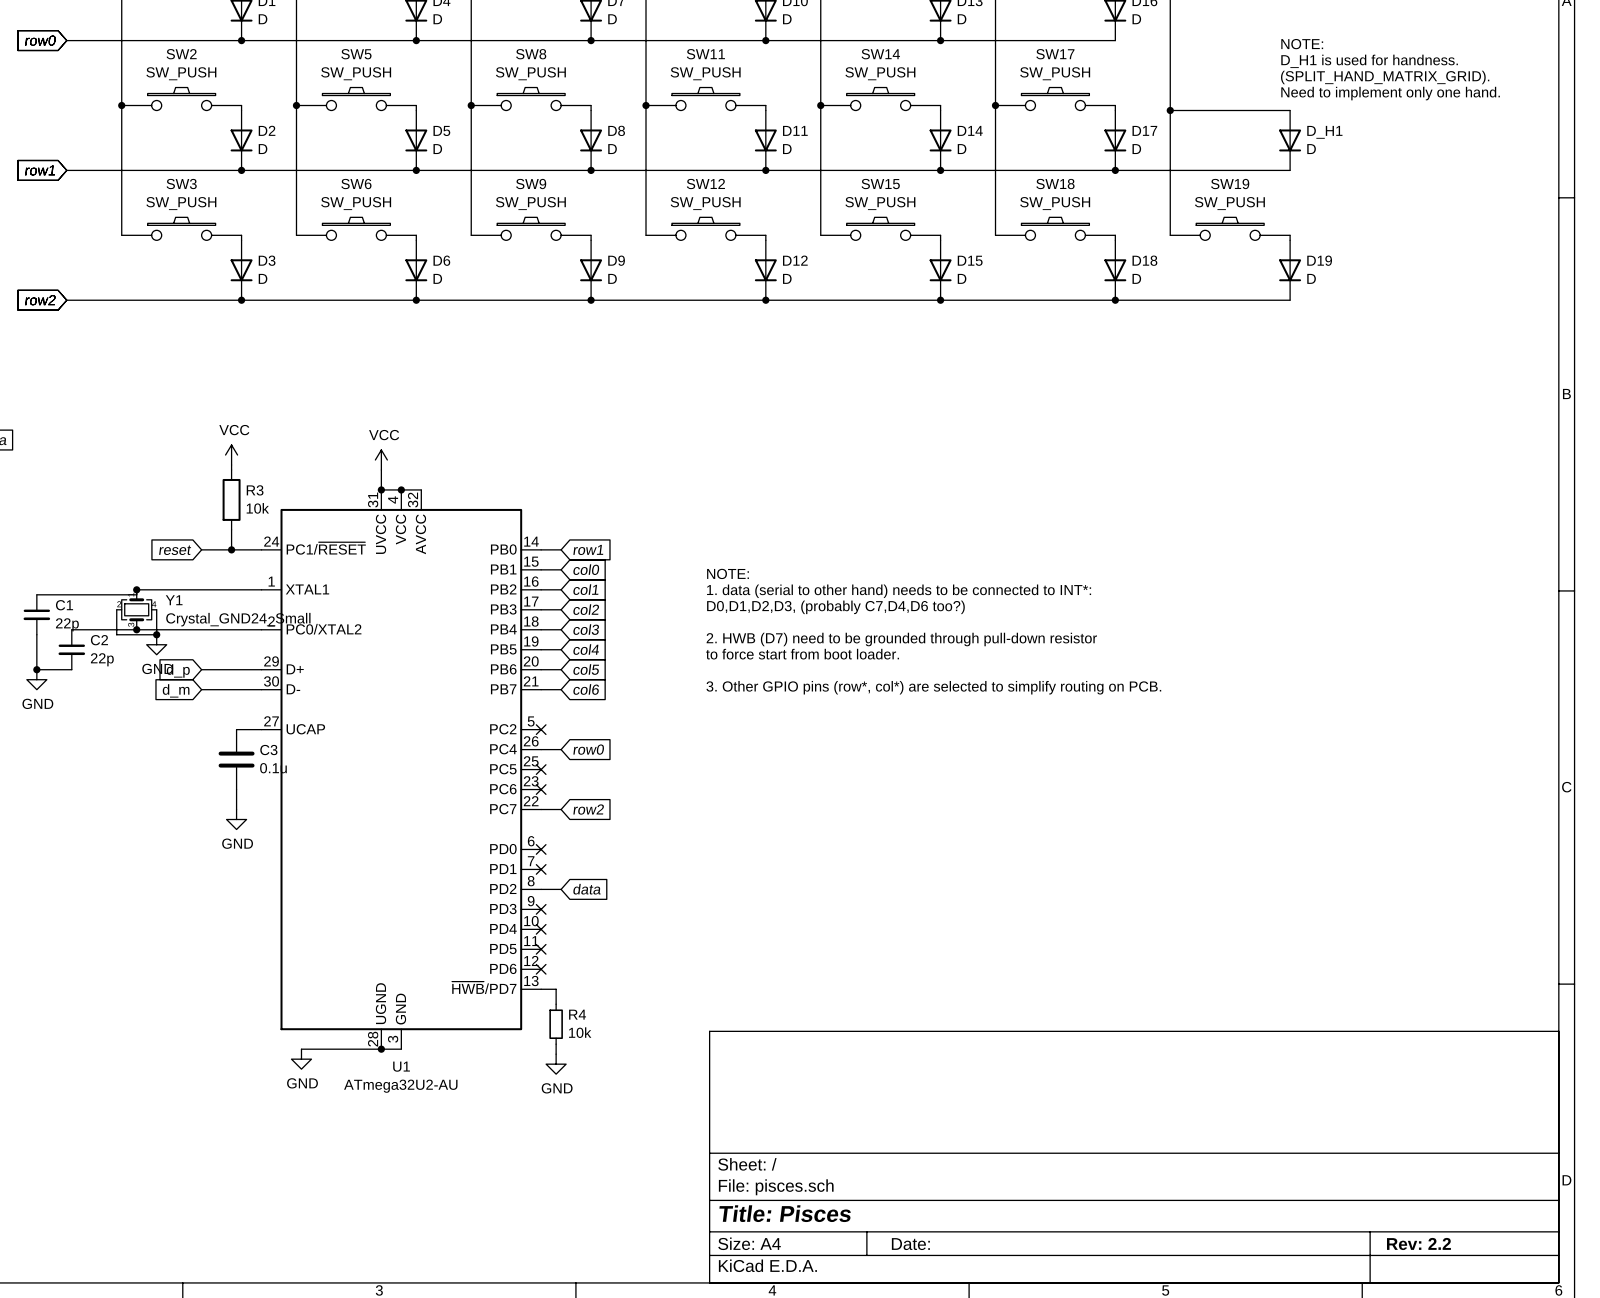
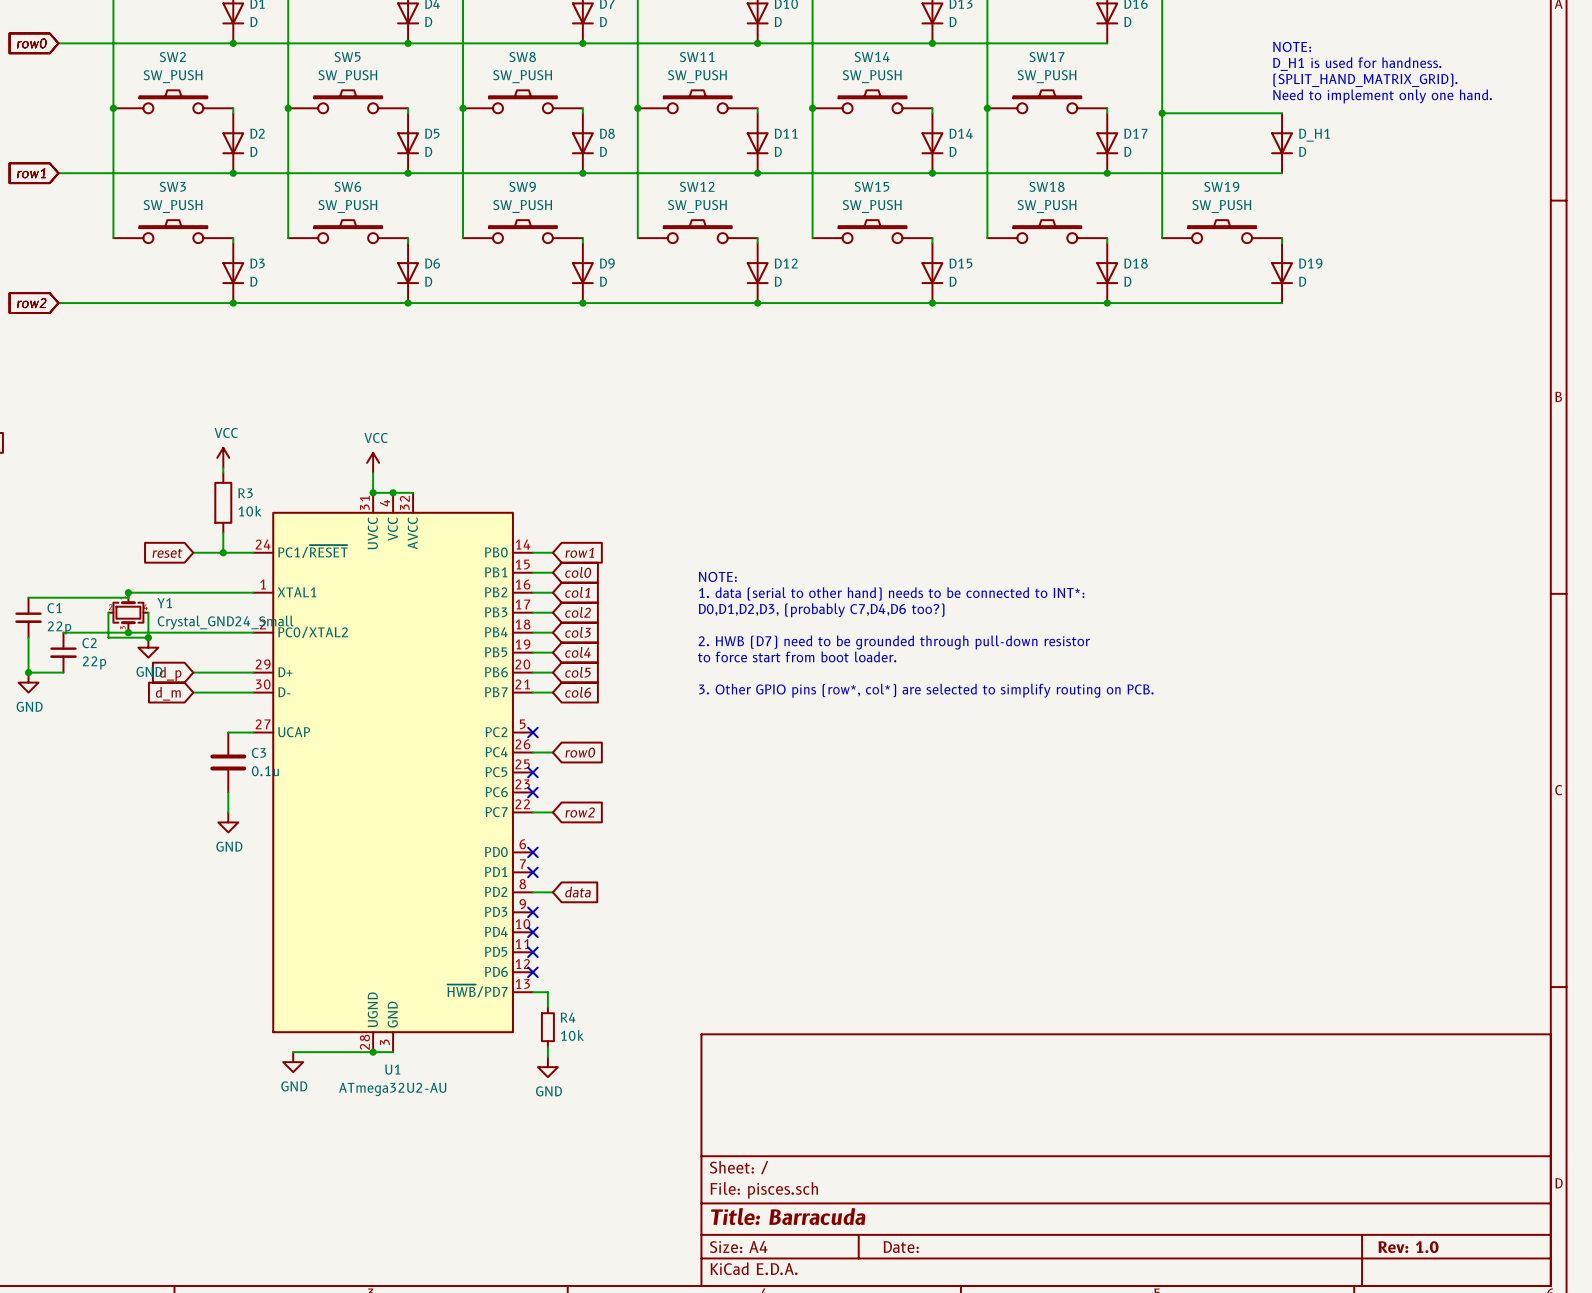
title block: Title: Pisces (785, 1213) -> Title: Barracuda (788, 1216)
title block: Rev: 2.2 (1418, 1243) -> Rev: 1.0 (1408, 1247)

